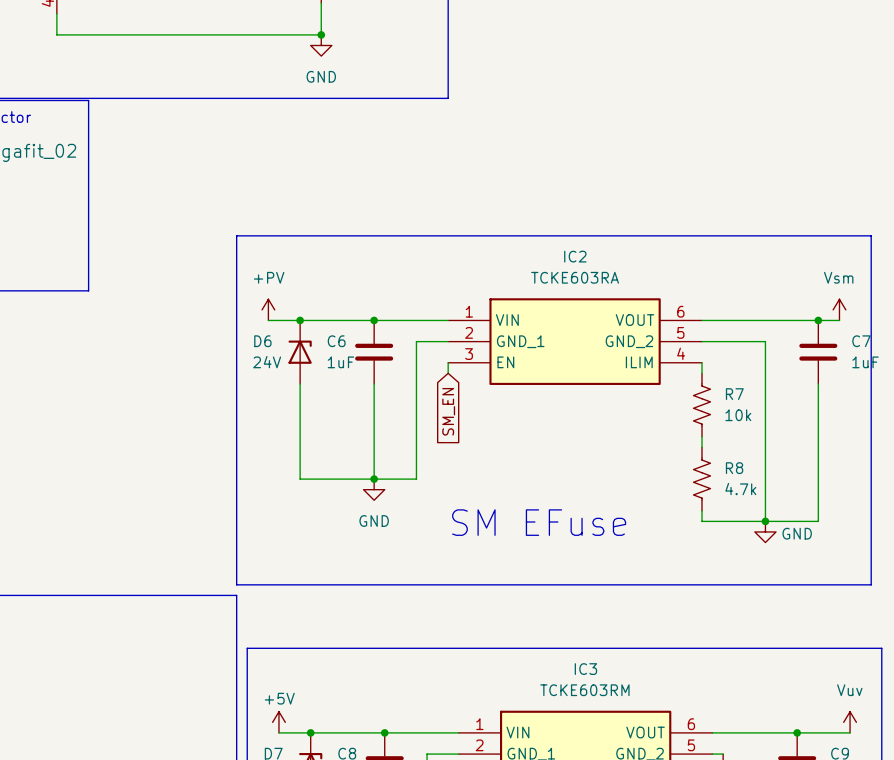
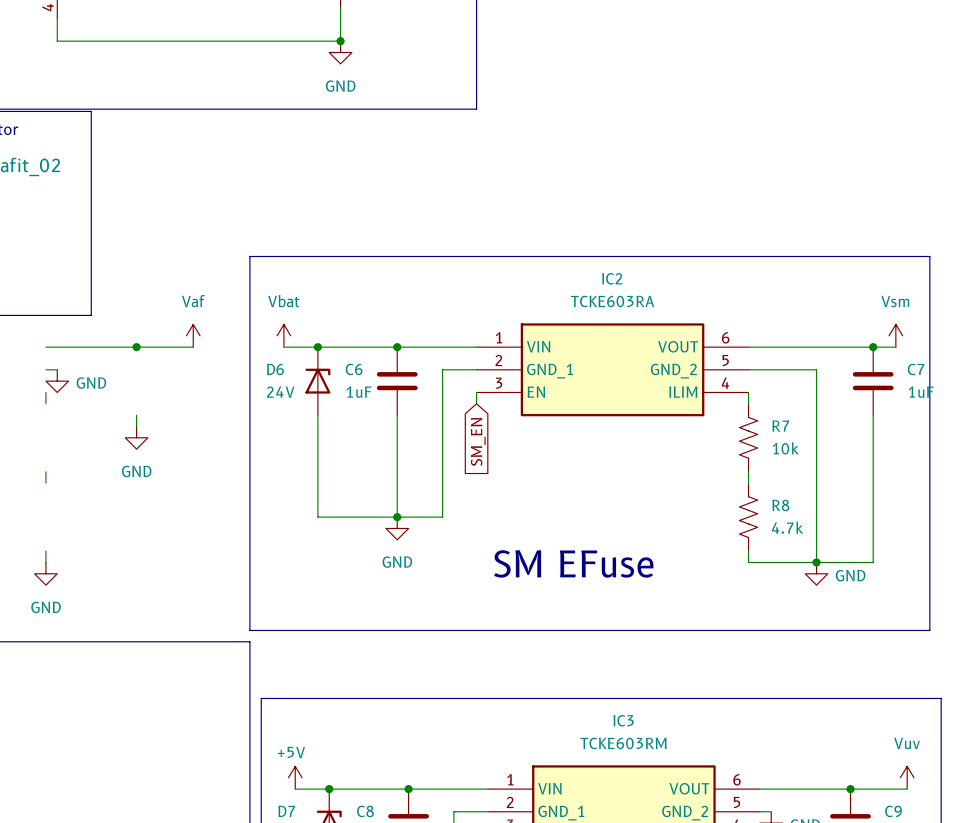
power symbol: none -> Vaf (193, 335)
power symbol: +PV (268, 309) -> Vbat (283, 335)
wire: none -> (45, 347) (193, 347)
junction: none -> (136, 347)
wire: none -> (45, 369) (57, 369)
power symbol: none -> GND (57, 381)
wire: none -> (45, 392) (45, 403)
wire: none -> (136, 415) (136, 426)
power symbol: none -> GND (136, 437)
wire: none -> (45, 471) (45, 483)
wire: none -> (45, 551) (45, 562)
power symbol: none -> GND (45, 573)

